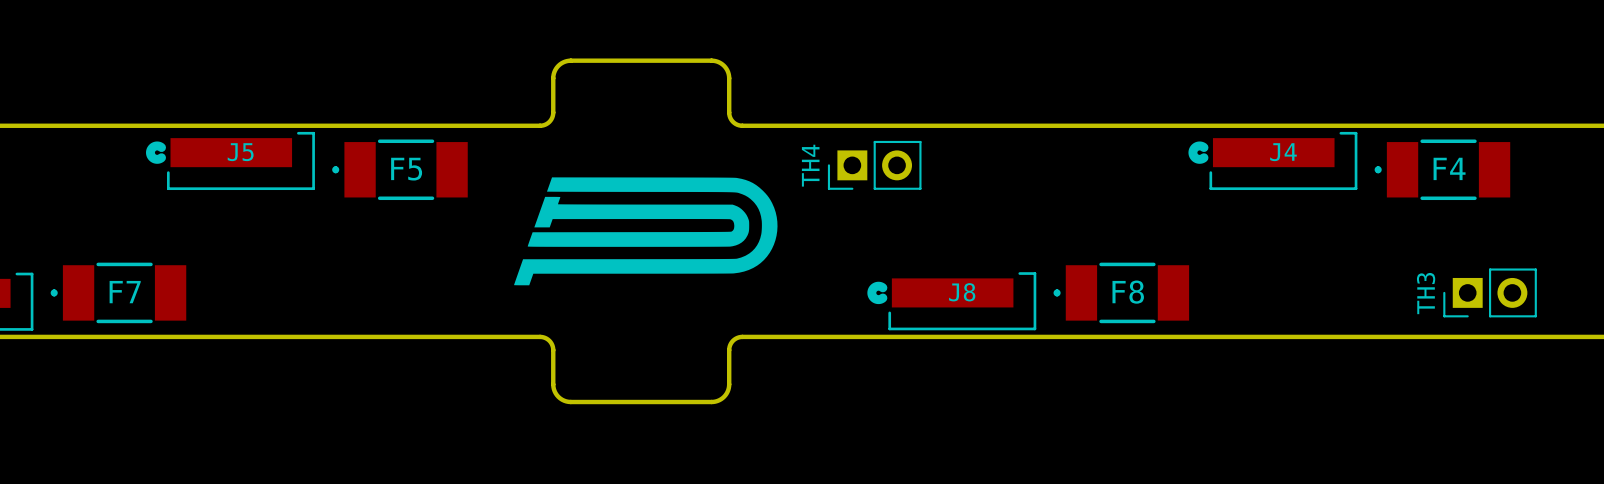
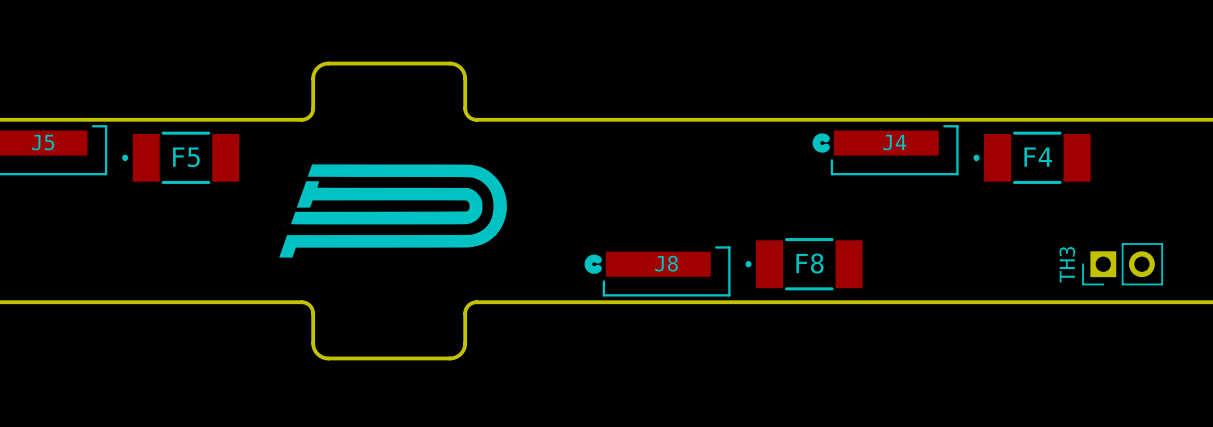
J4 position: (1272, 160) -> (885, 150)
TH4: (874, 165) -> none
F4 position: (1442, 169) -> (1032, 157)

